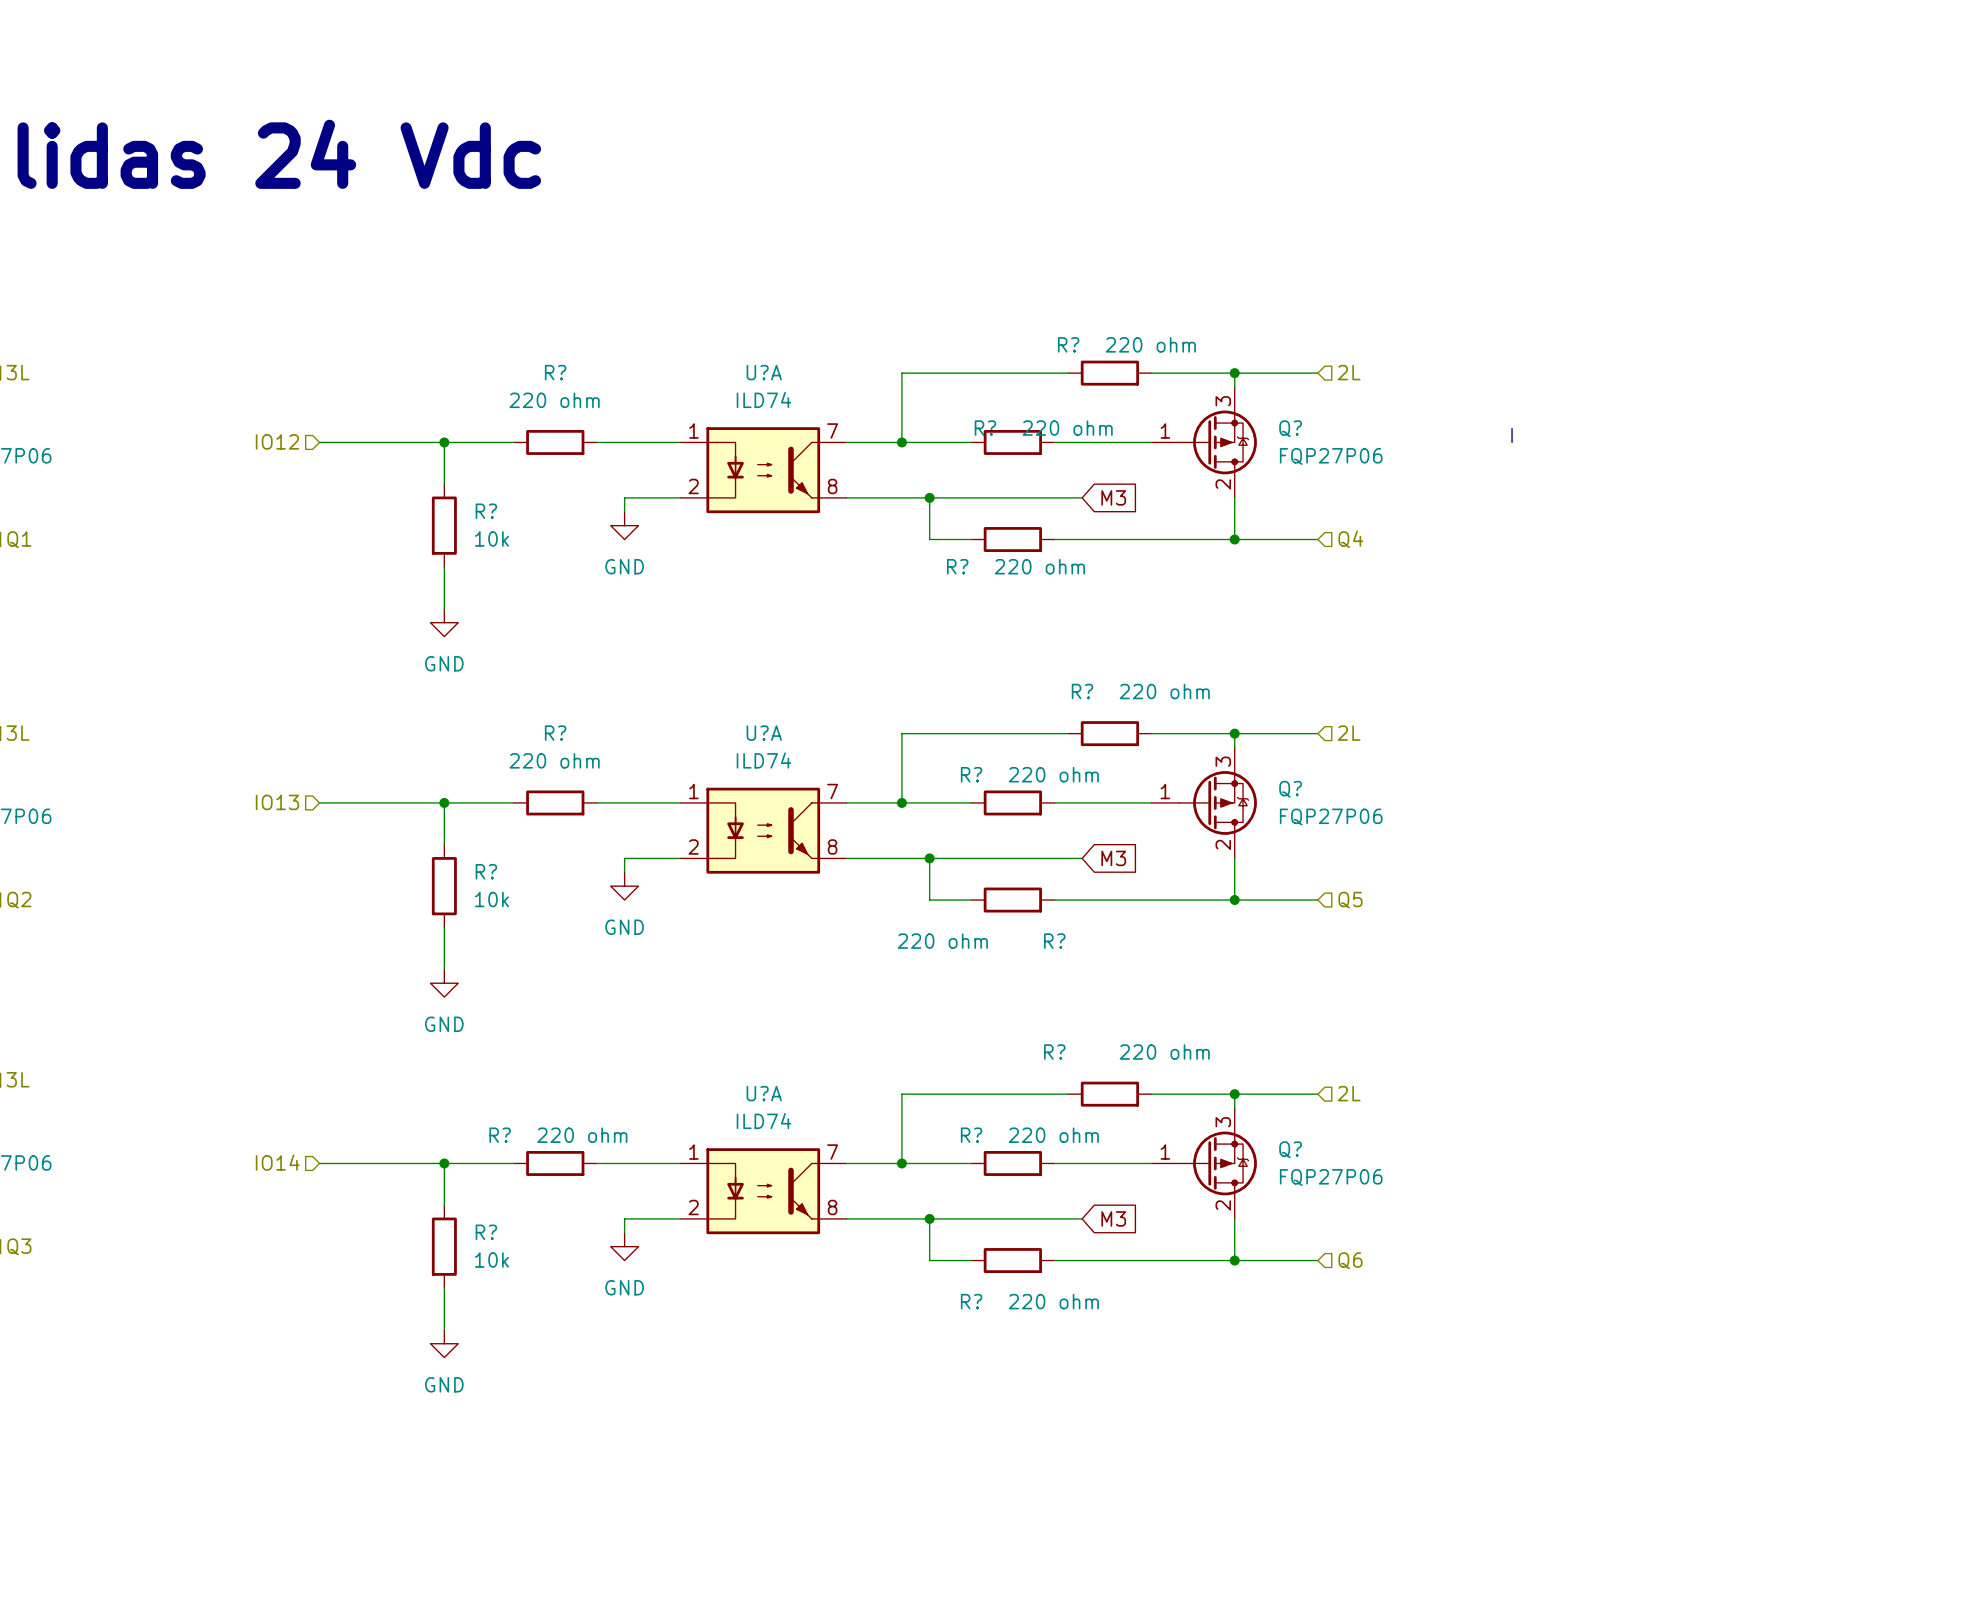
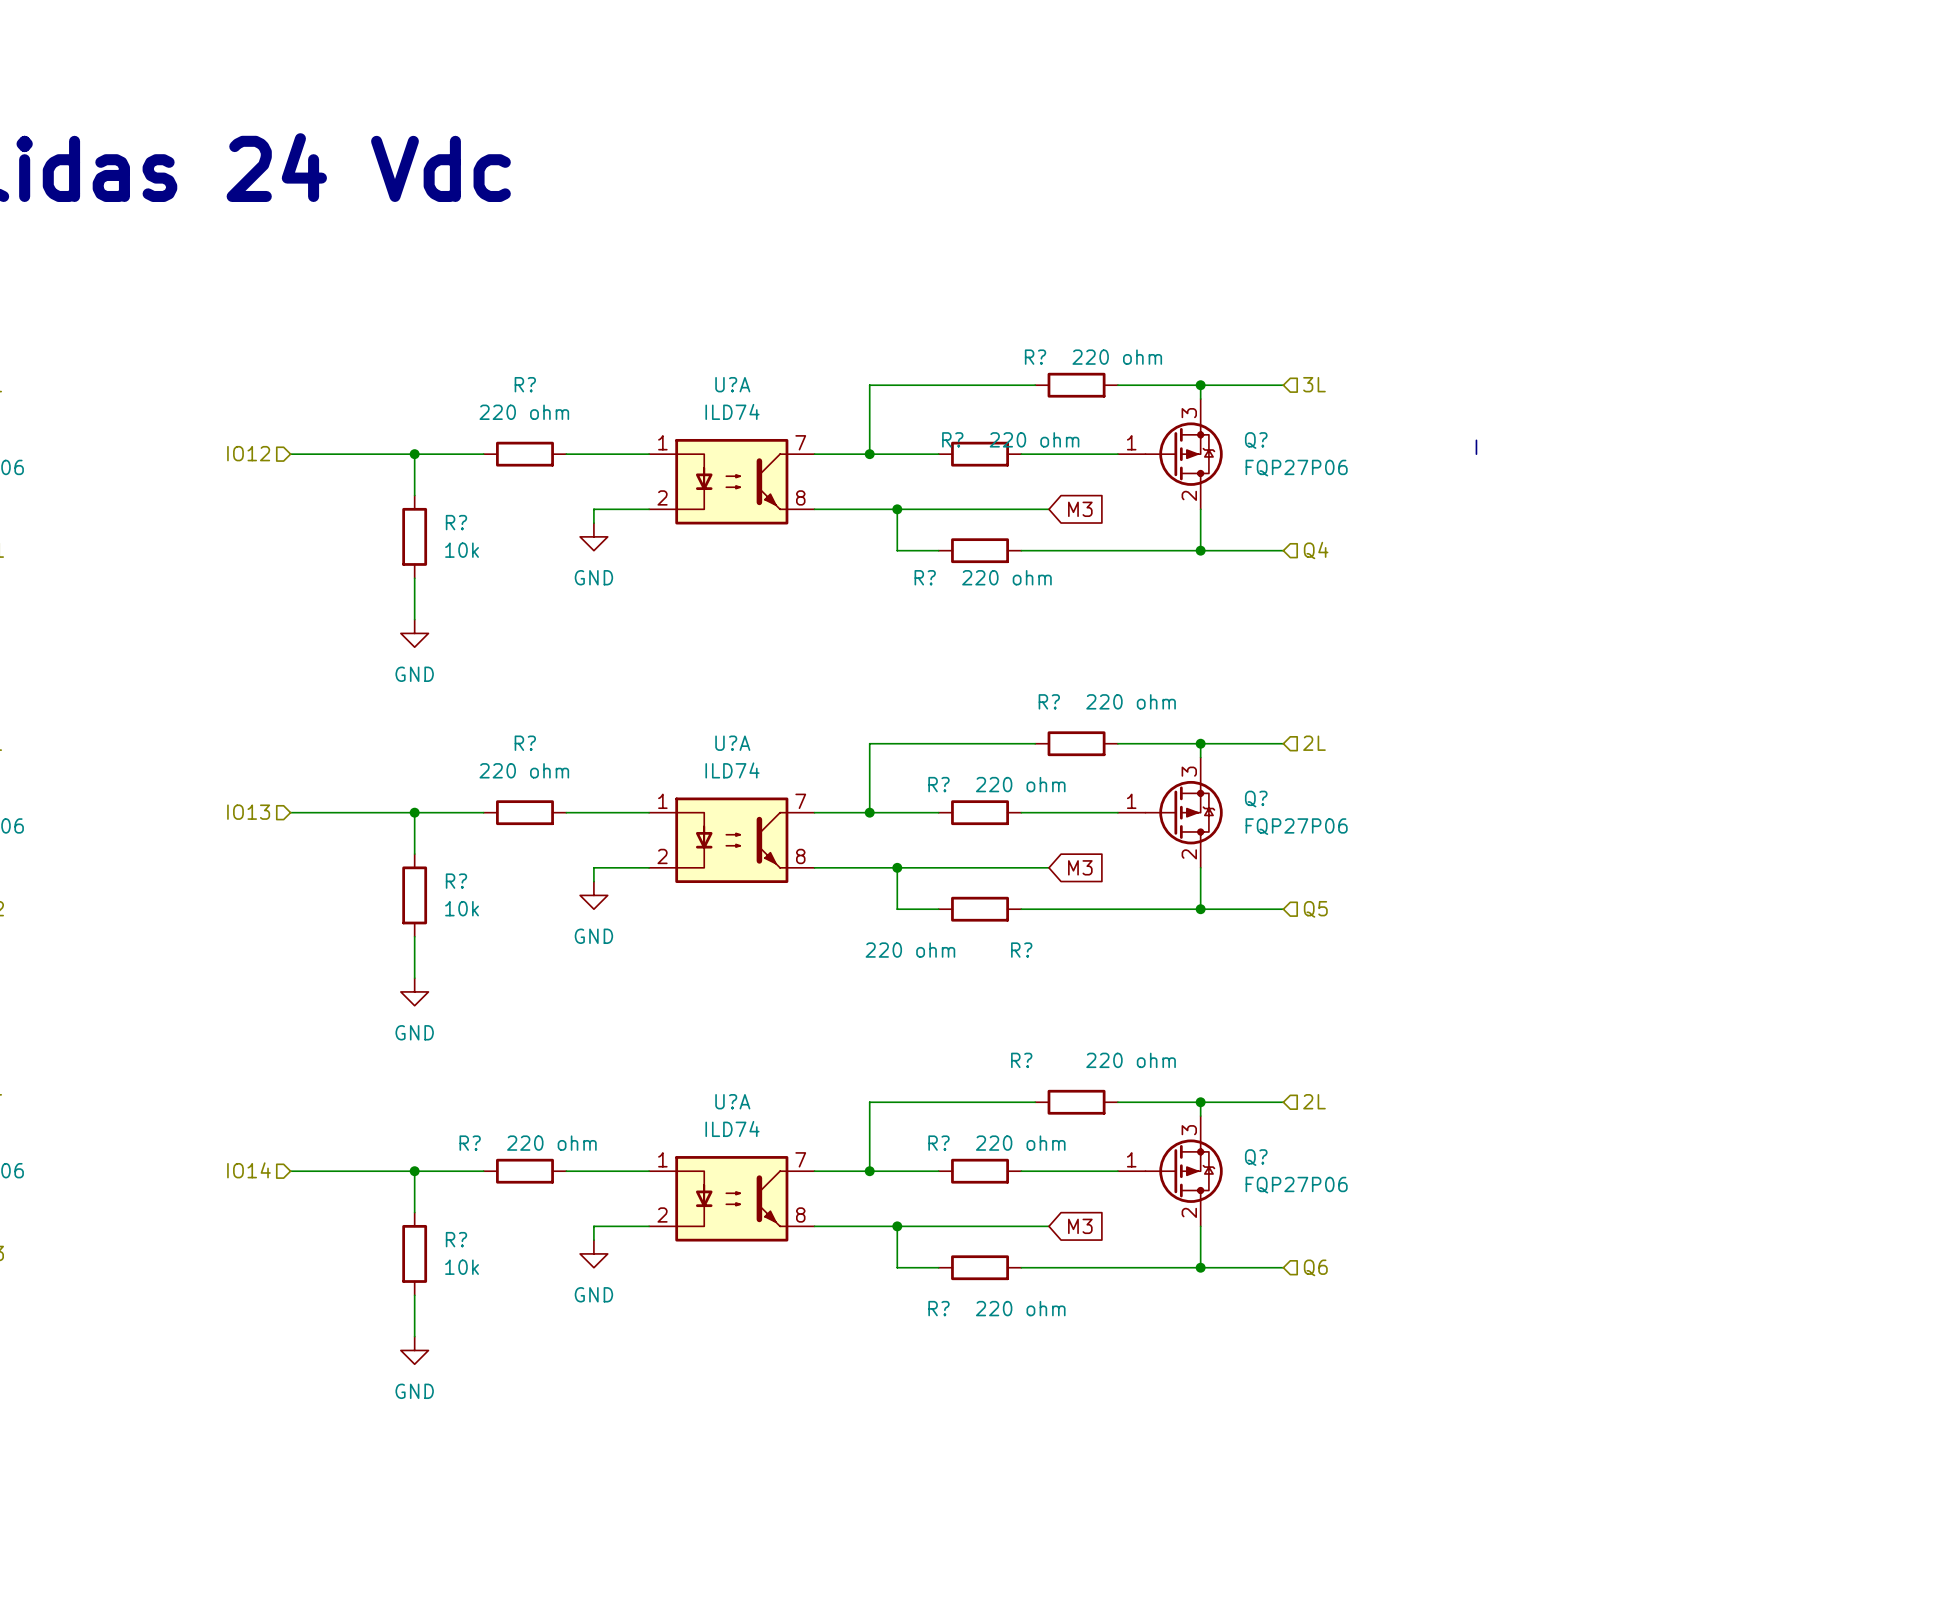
hierarchical label: 2L (1349, 372) -> 3L (1314, 384)

